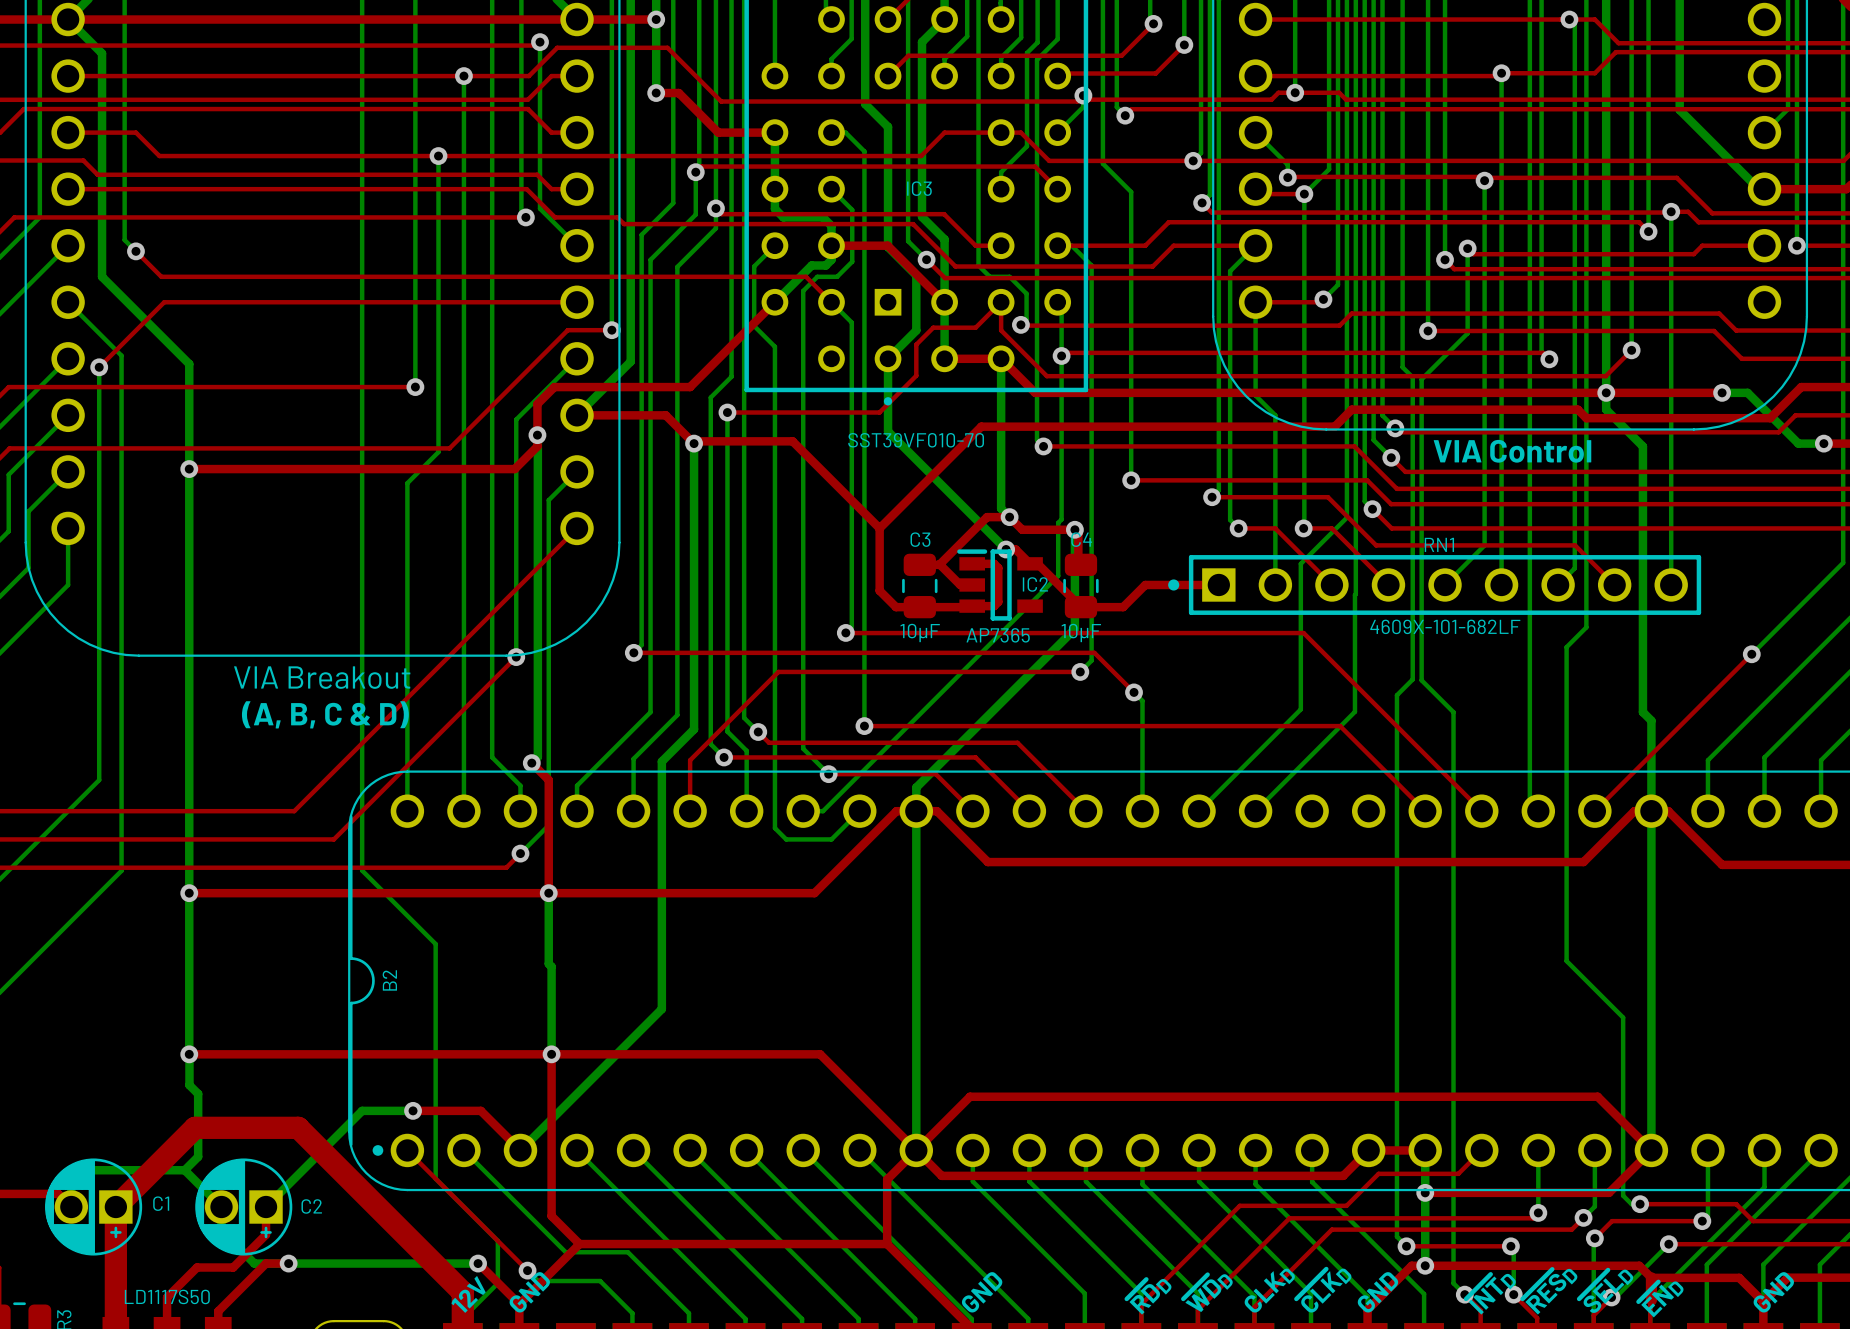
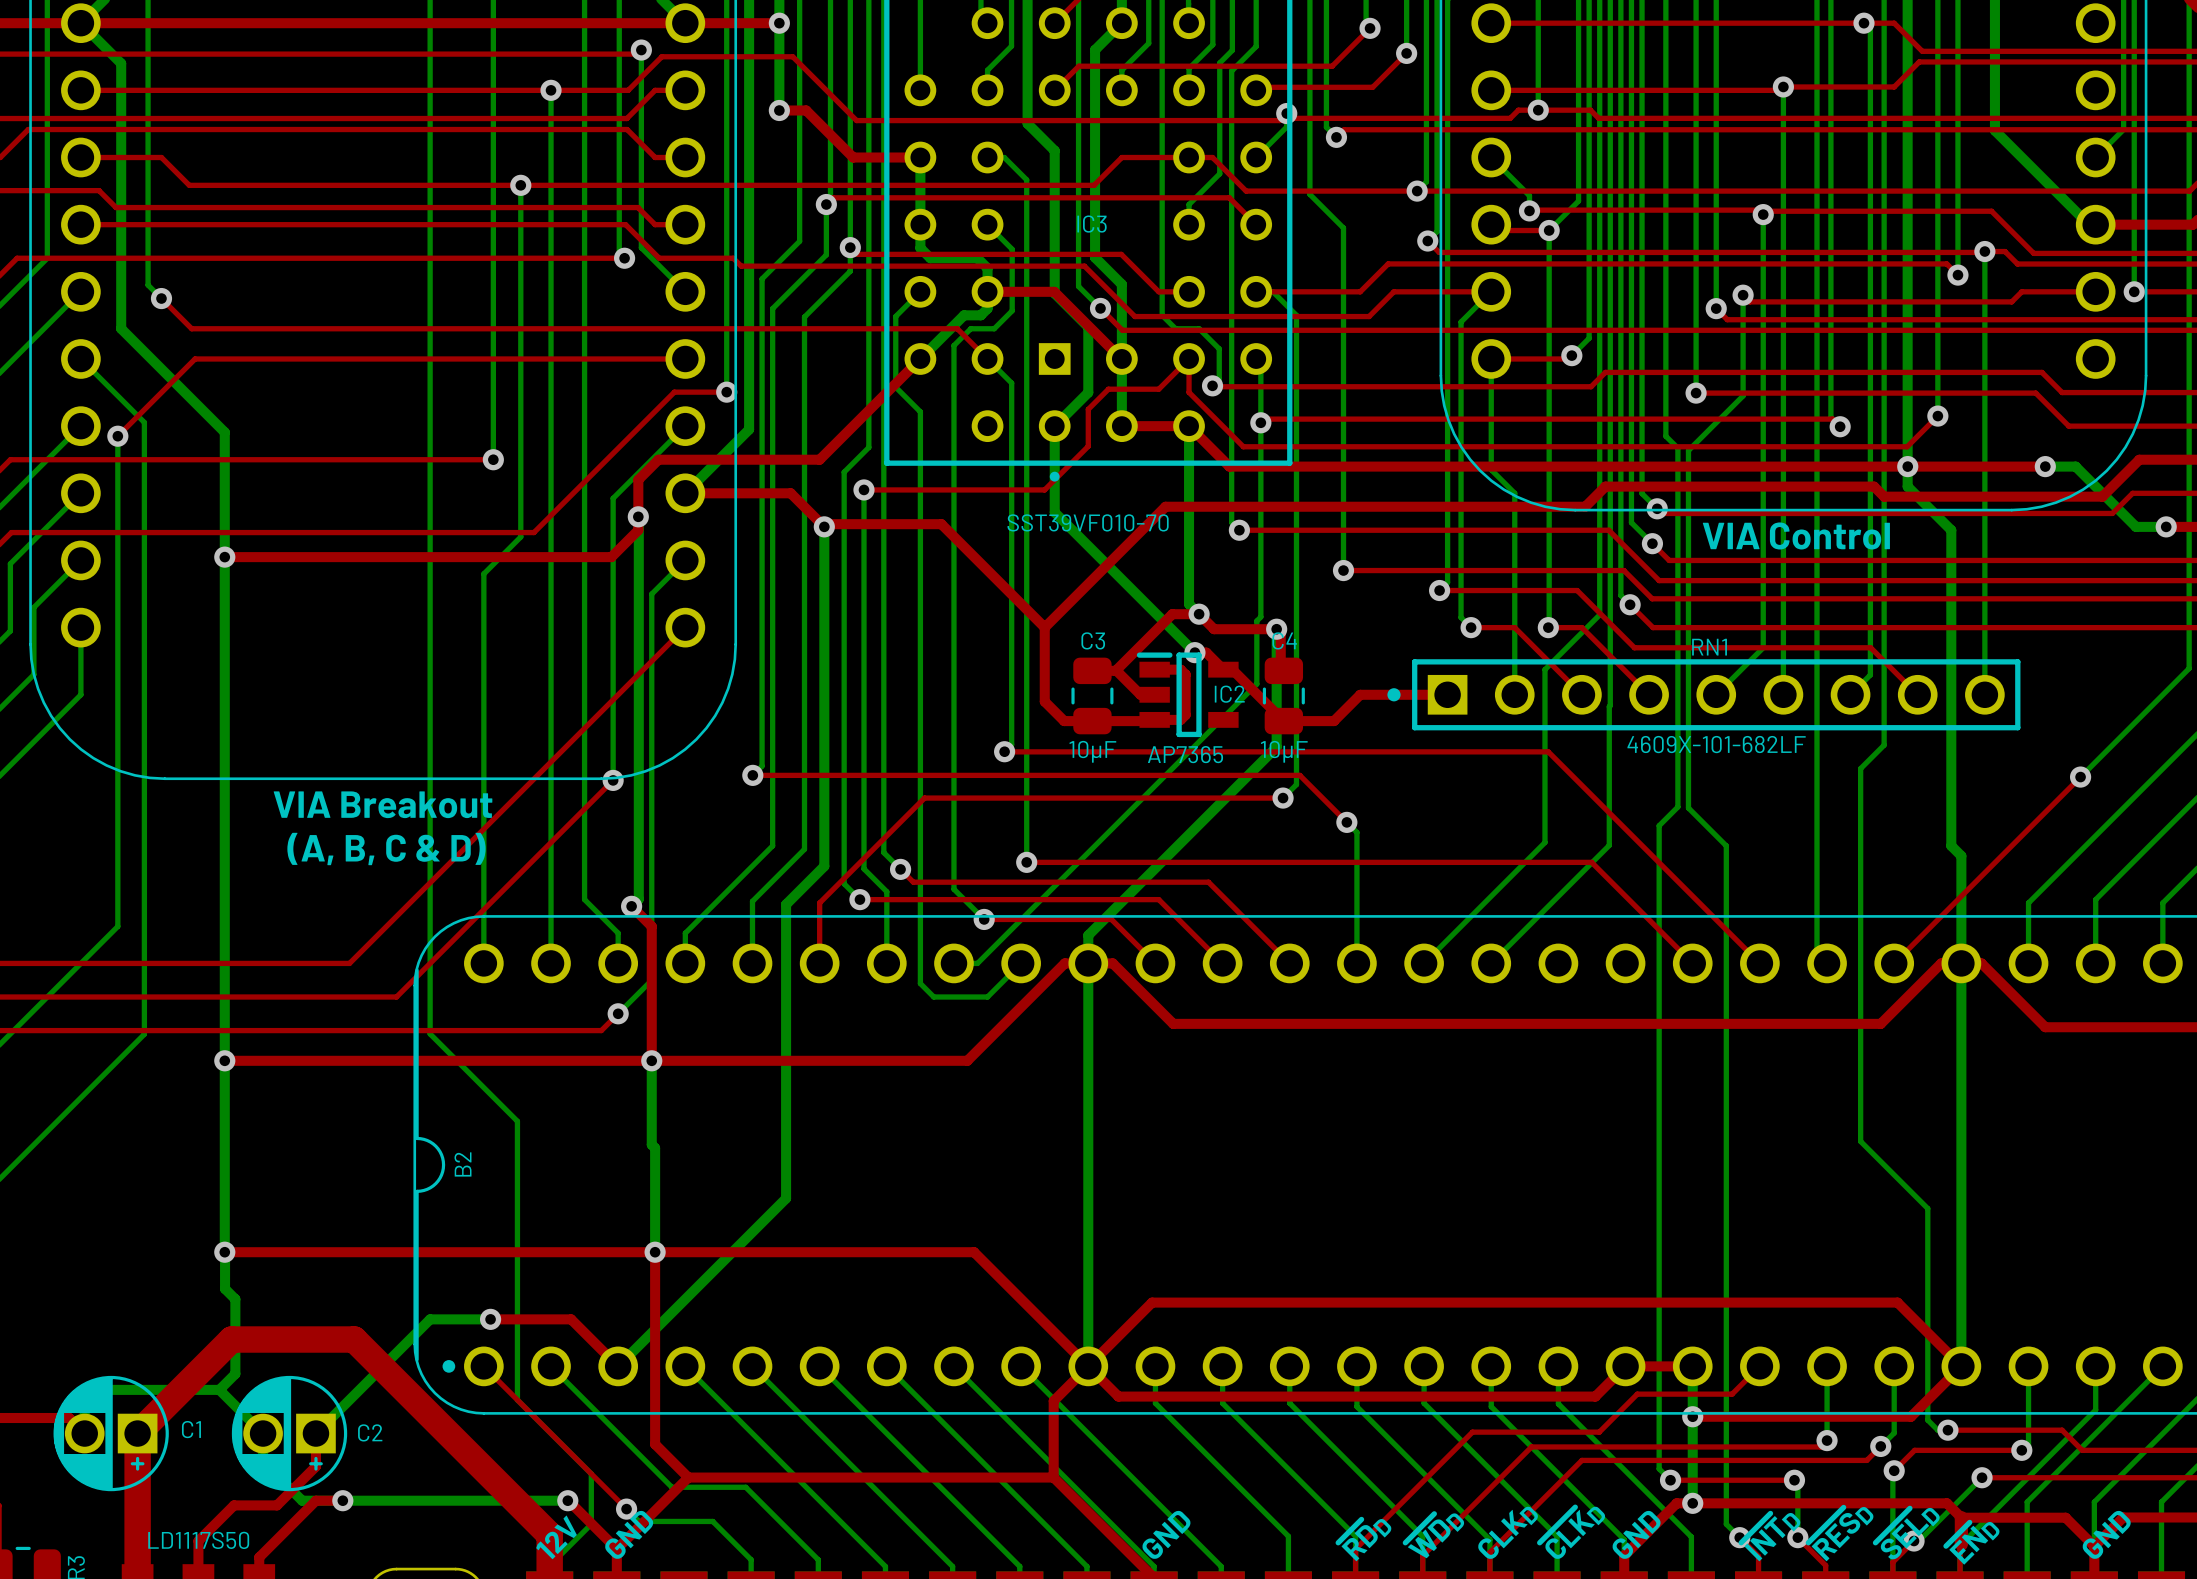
part text: none -> VIA Breakout (383, 804)
part text: VIA Breakout (322, 677) -> none

